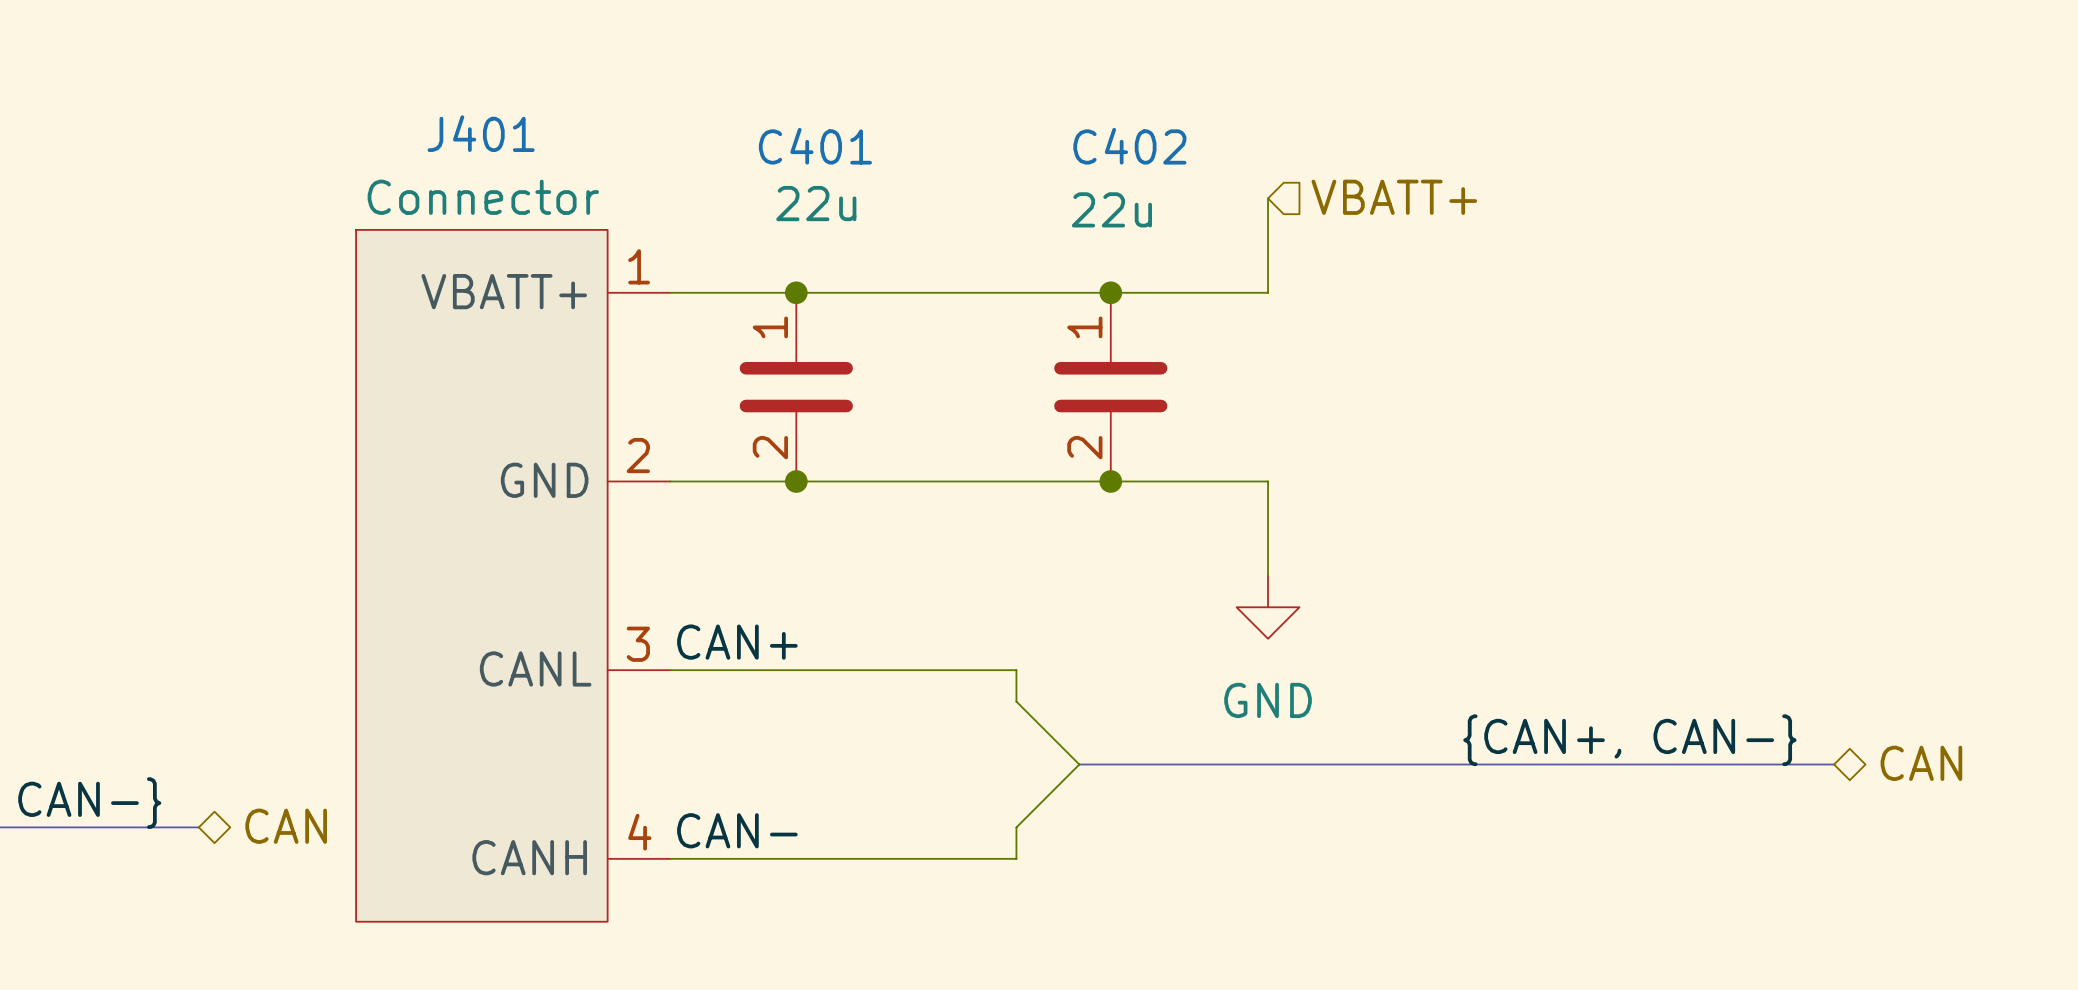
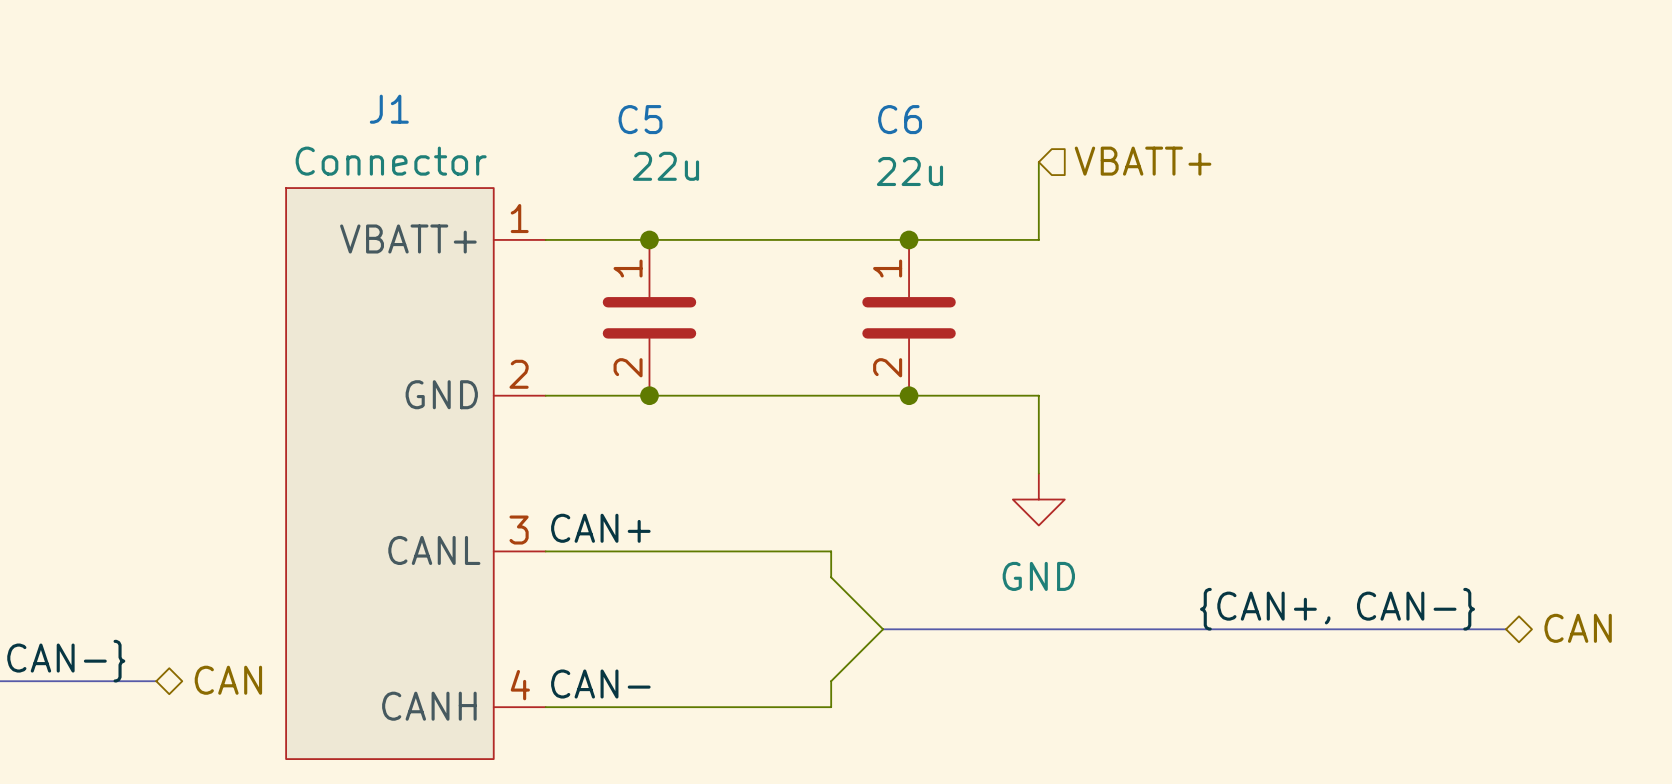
J401 name: J401 (481, 133) -> J1 (389, 109)
C401 name: C401 (815, 146) -> C5 (640, 119)
C402 name: C402 (1129, 146) -> C6 (900, 119)

